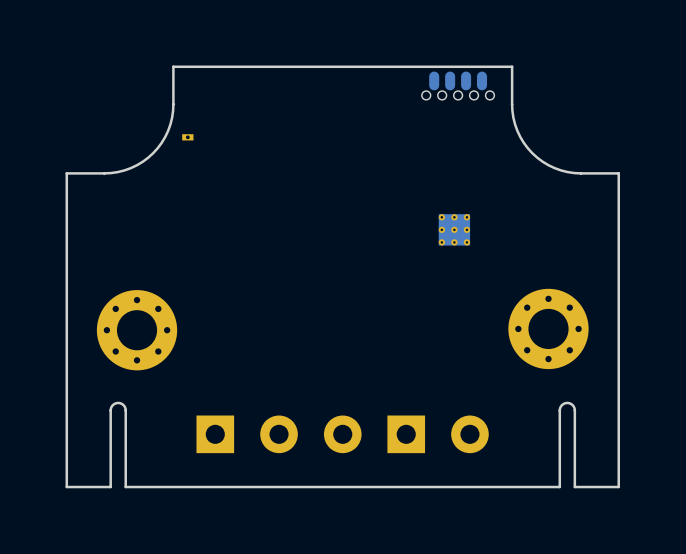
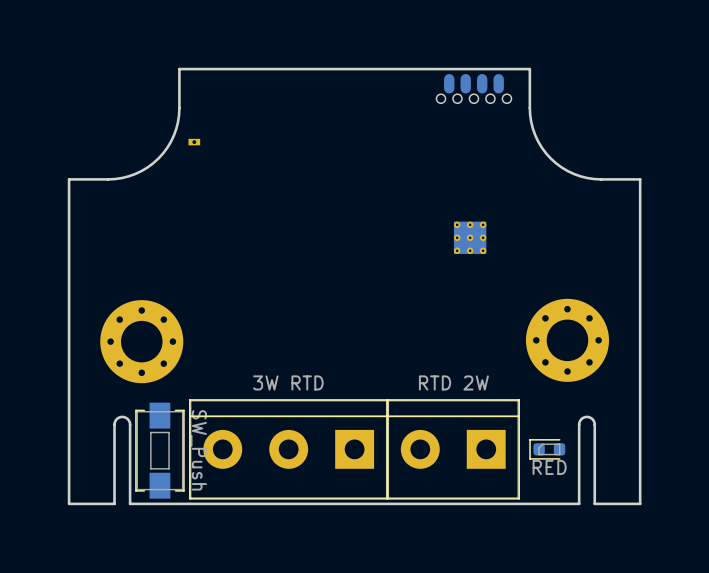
part side: top (279, 434) -> bottom (288, 449)
part side: top (438, 434) -> bottom (453, 449)
part: none -> RED (547, 449)
part: none -> SW_Push (159, 450)

